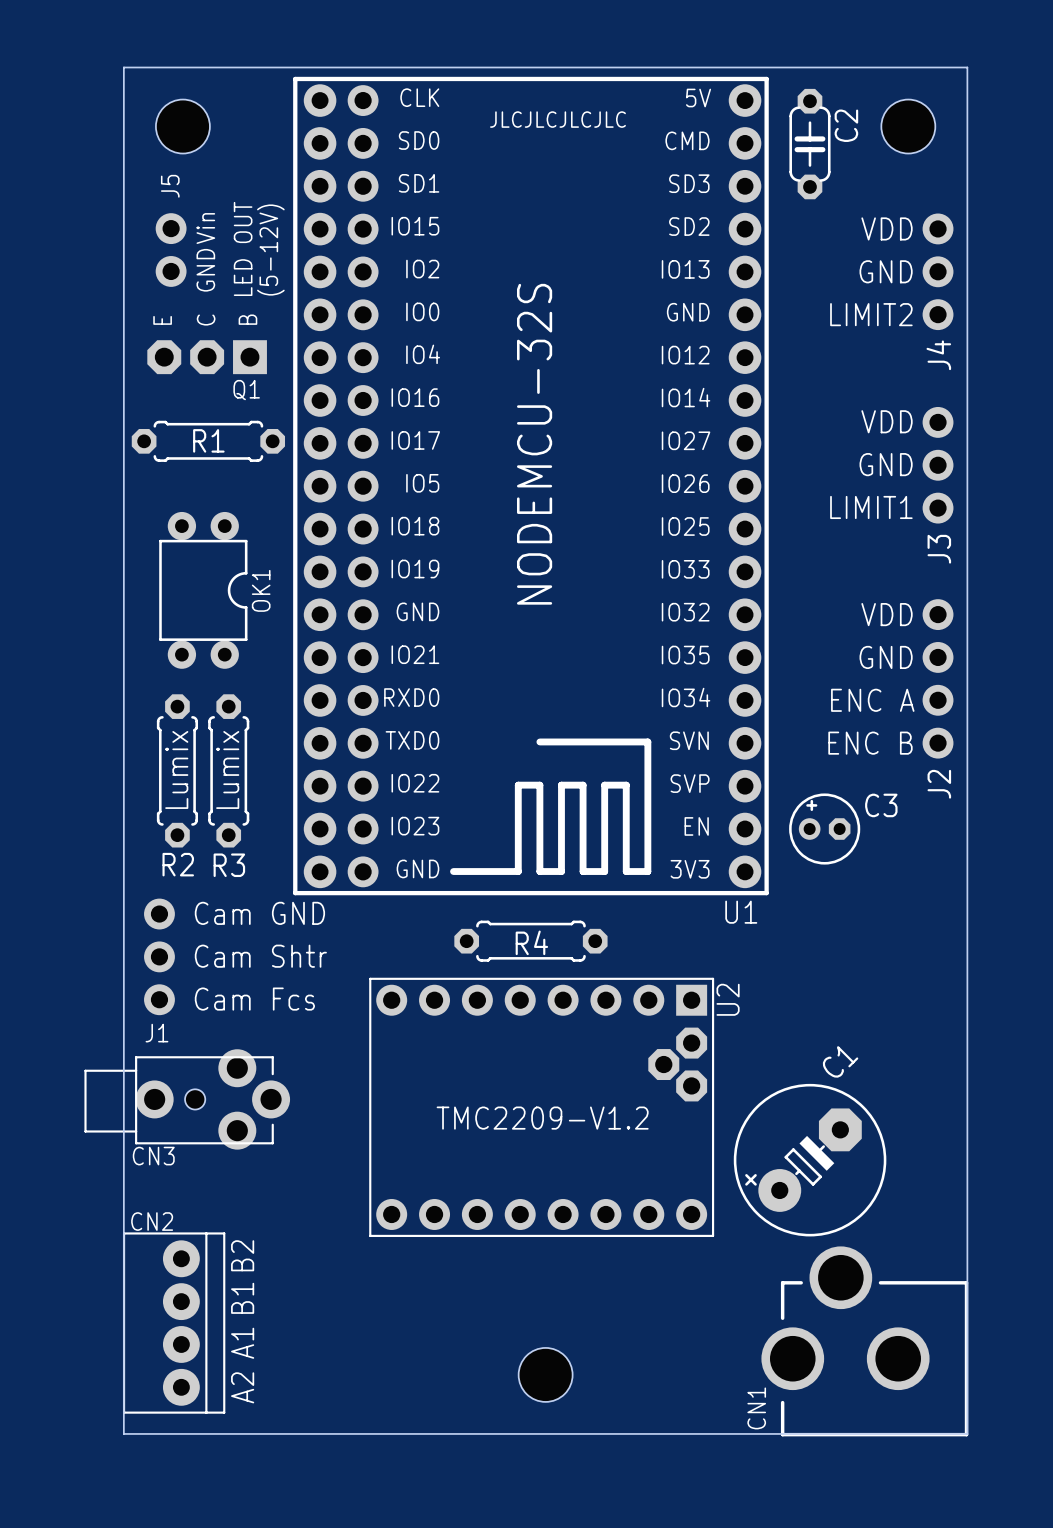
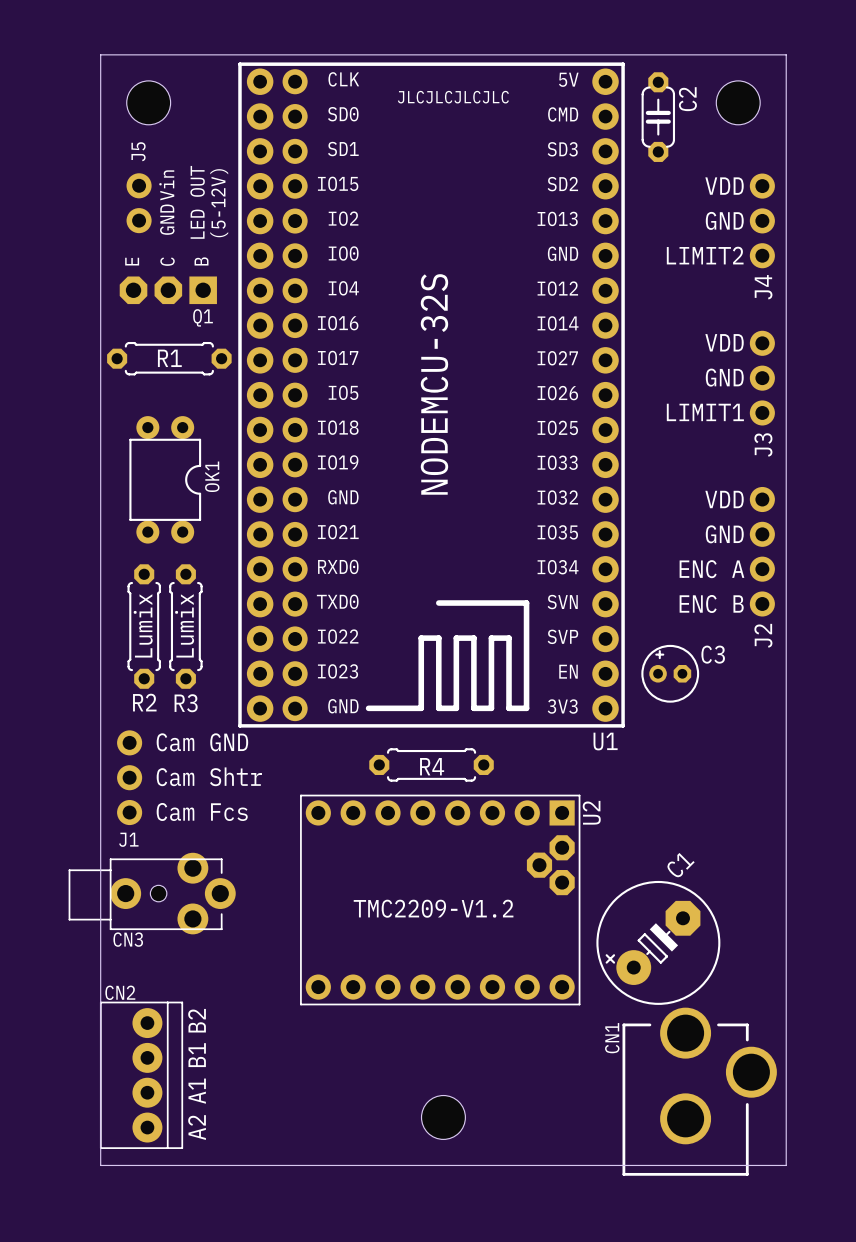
CN1 rotation: 0° (864, 1341) -> 90° clockwise (699, 1091)
CN1 name position: CN1 (756, 1408) -> CN1 (612, 1038)

